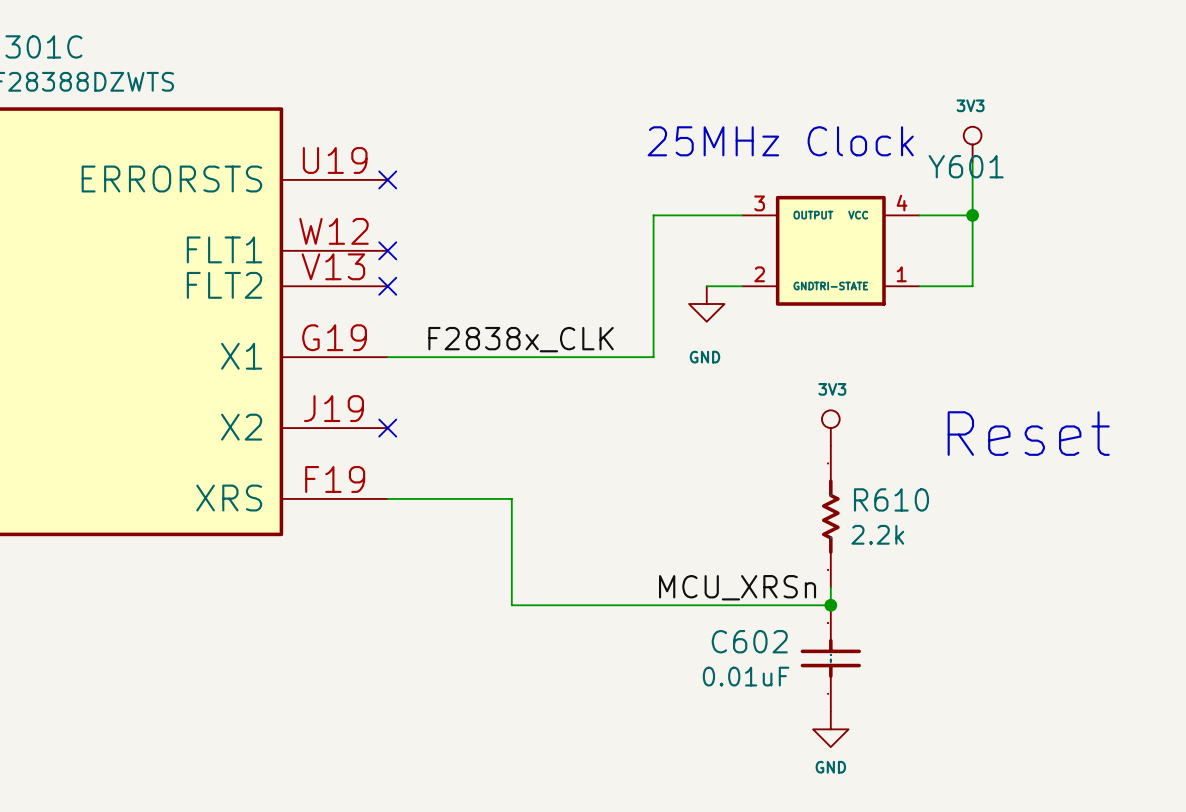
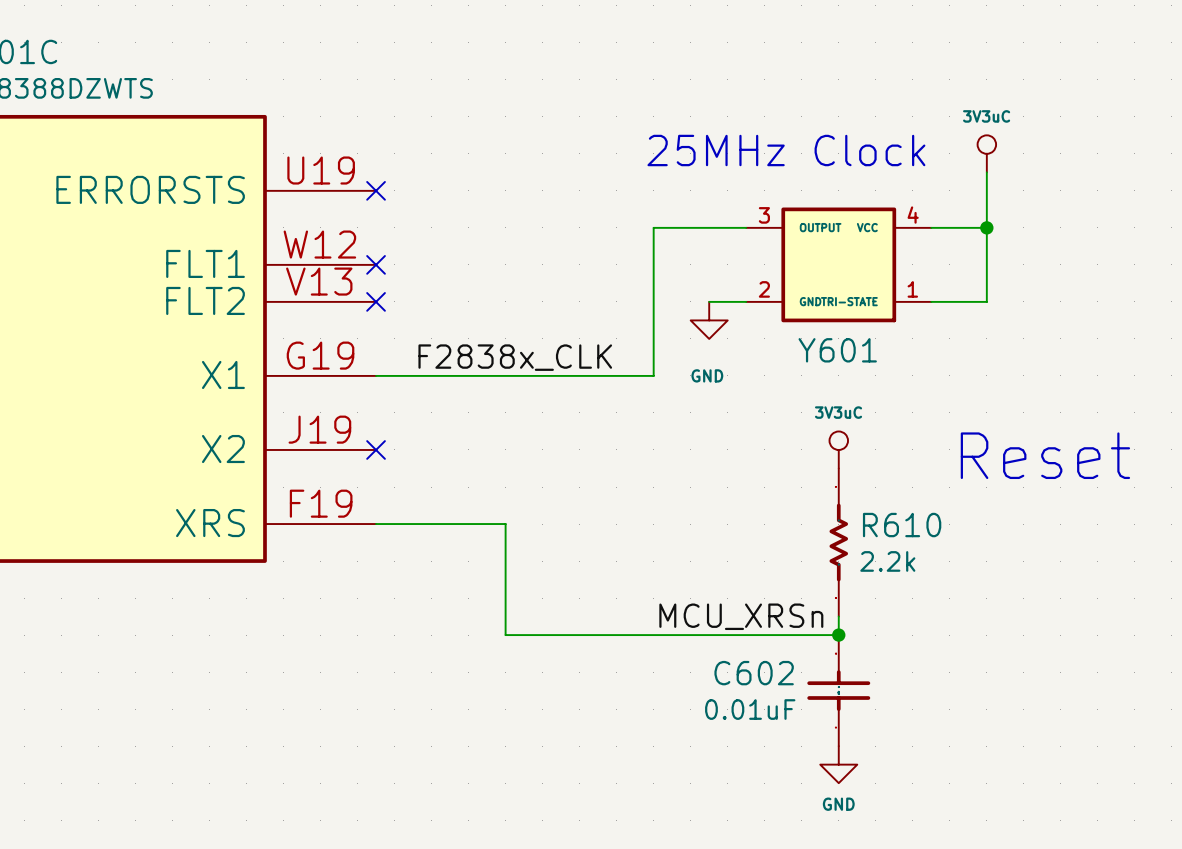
power symbol: 3V3 (972, 144) -> 3V3uC (986, 153)
Y601 name position: Y601 (966, 166) -> Y601 (837, 350)
power symbol: 3V3 (830, 428) -> 3V3uC (838, 449)

